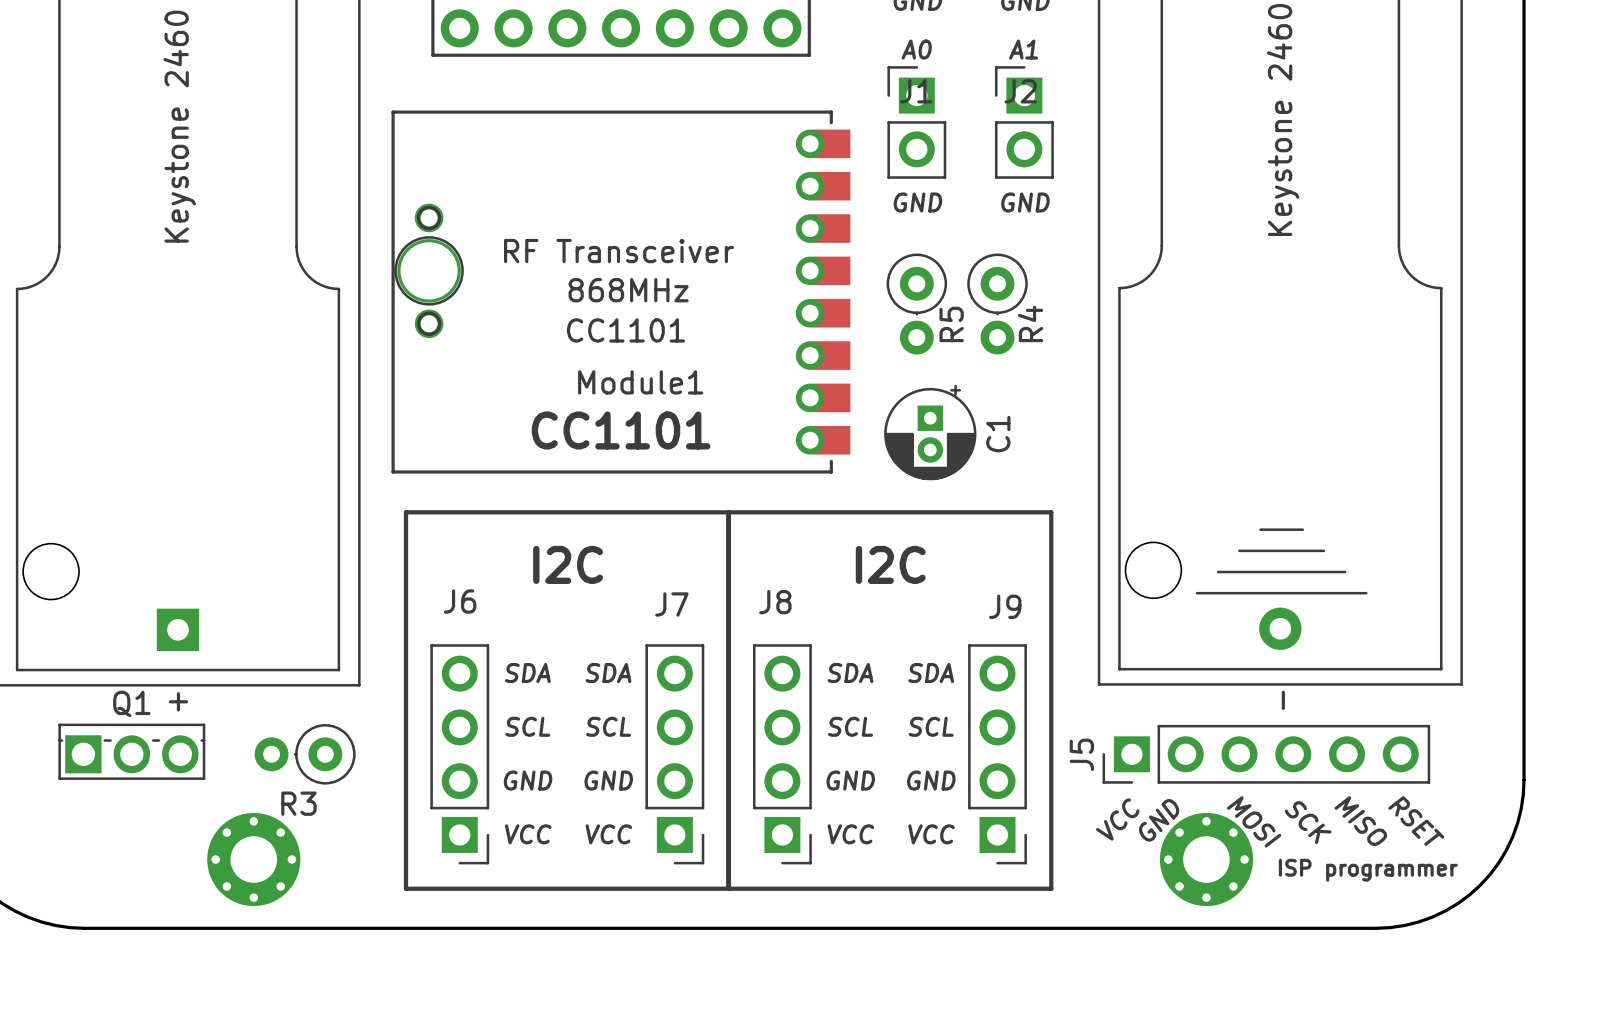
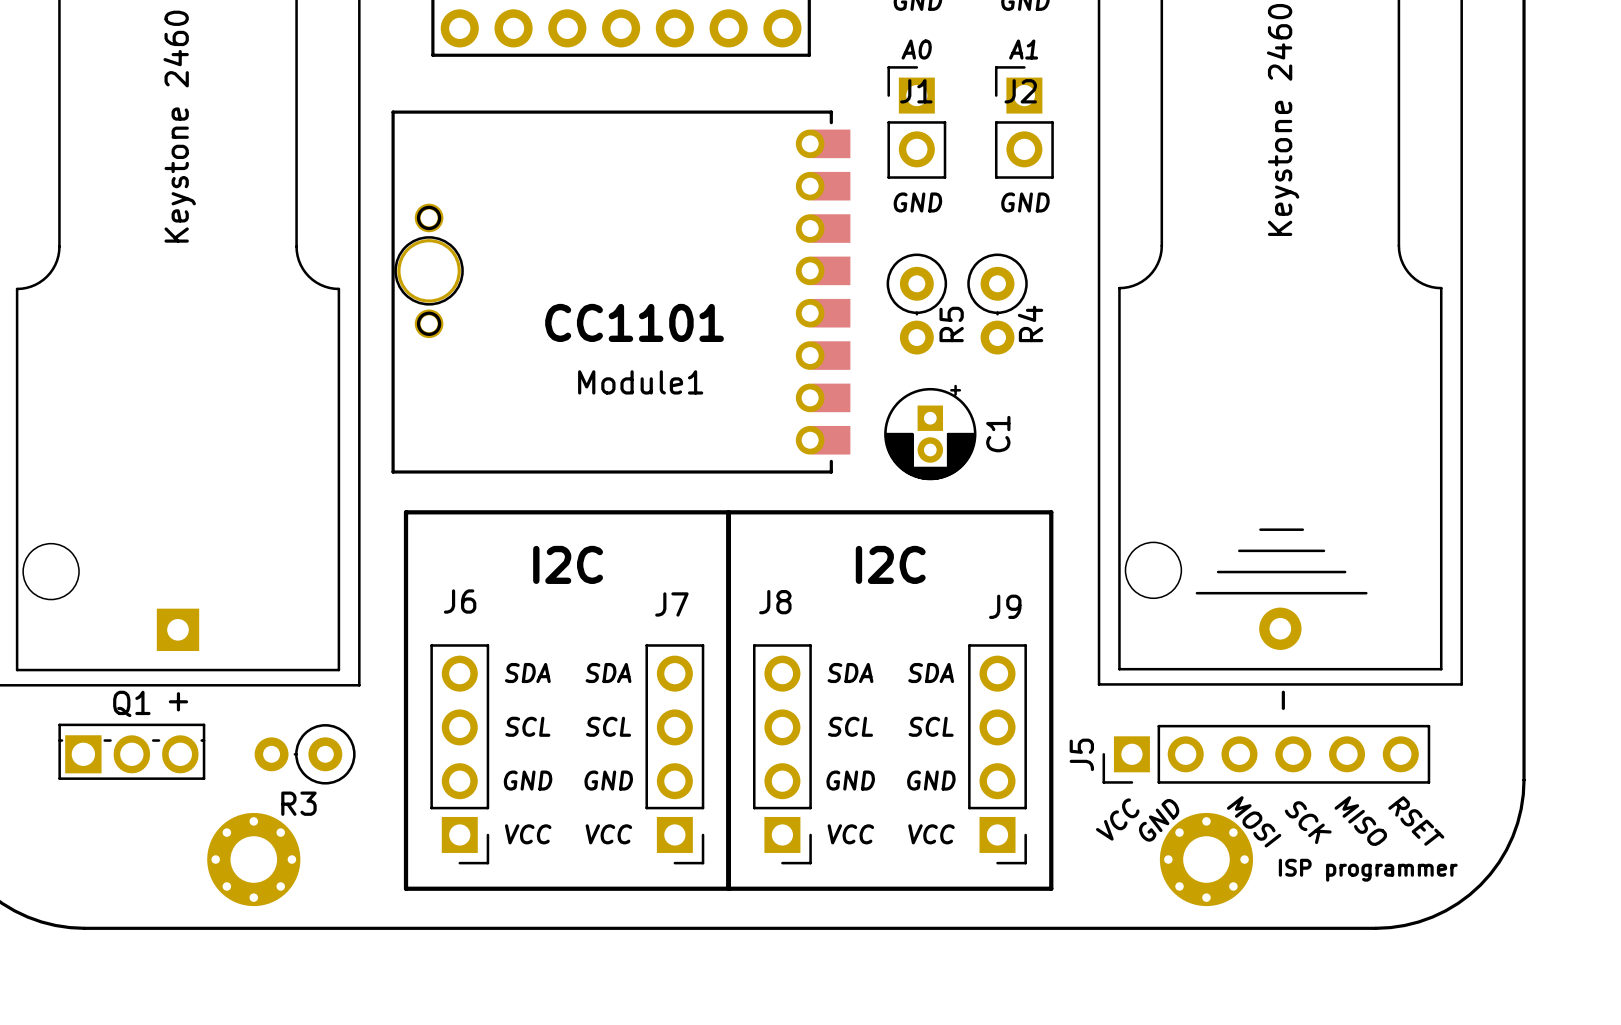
Module1 text: RF Transceiver (619, 251) -> none
Module1 text: 868MHz (628, 290) -> none
Module1 text: CC1101 (625, 330) -> none
text position: CC1101 (621, 430) -> CC1101 (634, 322)

